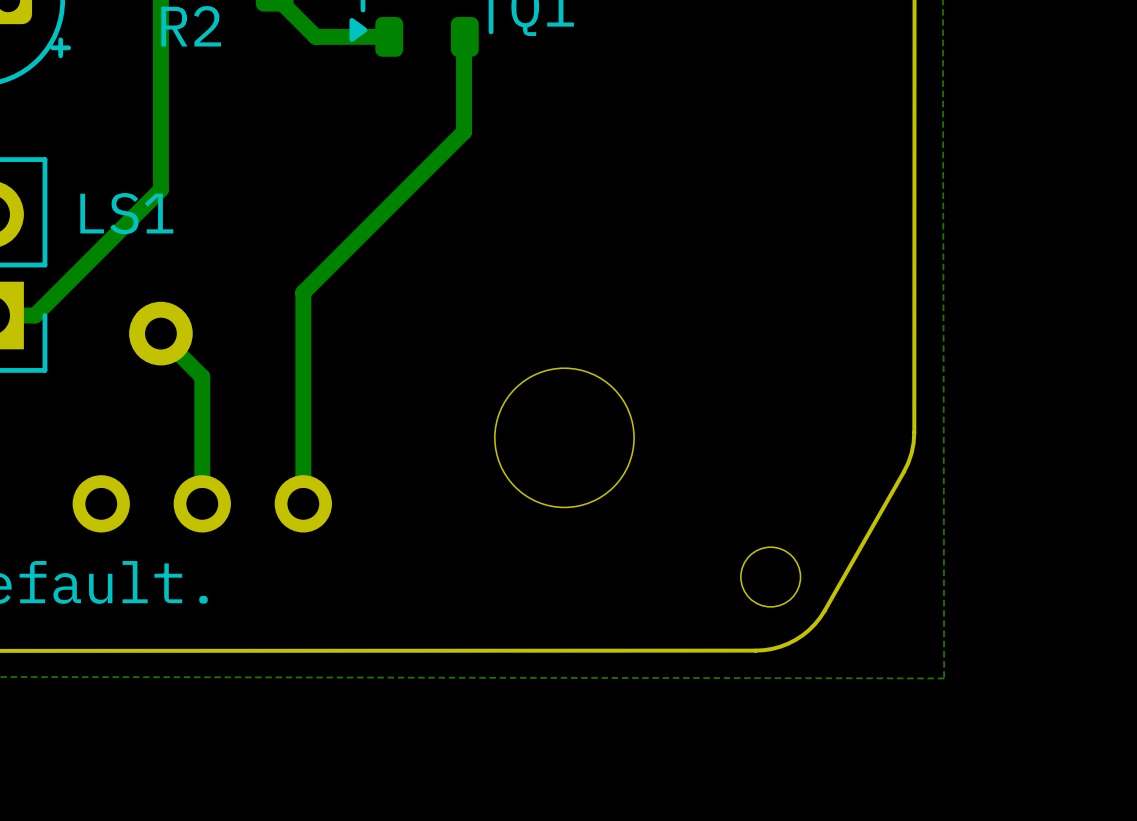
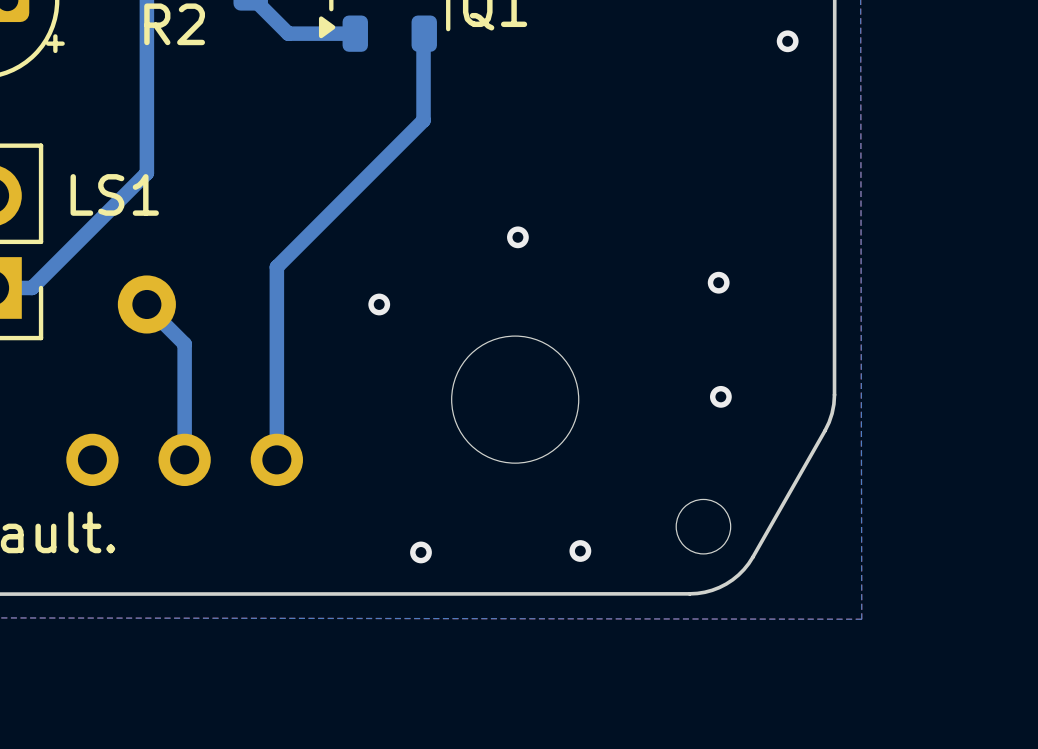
via: none -> (787, 41)
via: none -> (517, 237)
via: none -> (718, 282)
via: none -> (379, 304)
via: none -> (720, 396)
via: none -> (580, 551)
via: none -> (420, 552)

